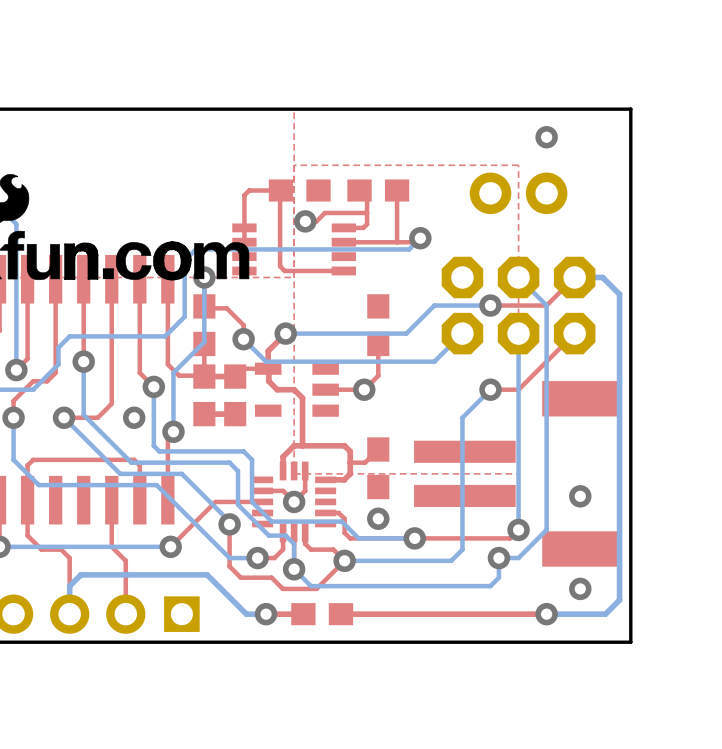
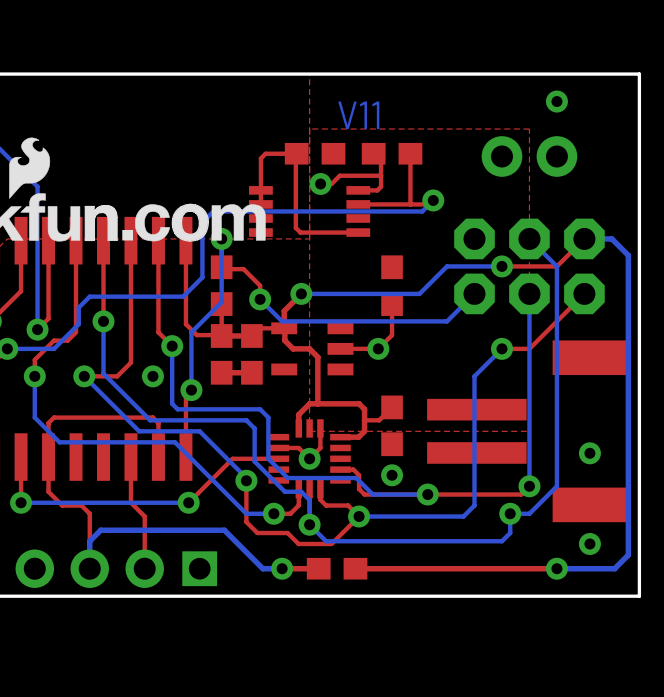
text: none -> V11 (358, 115)

